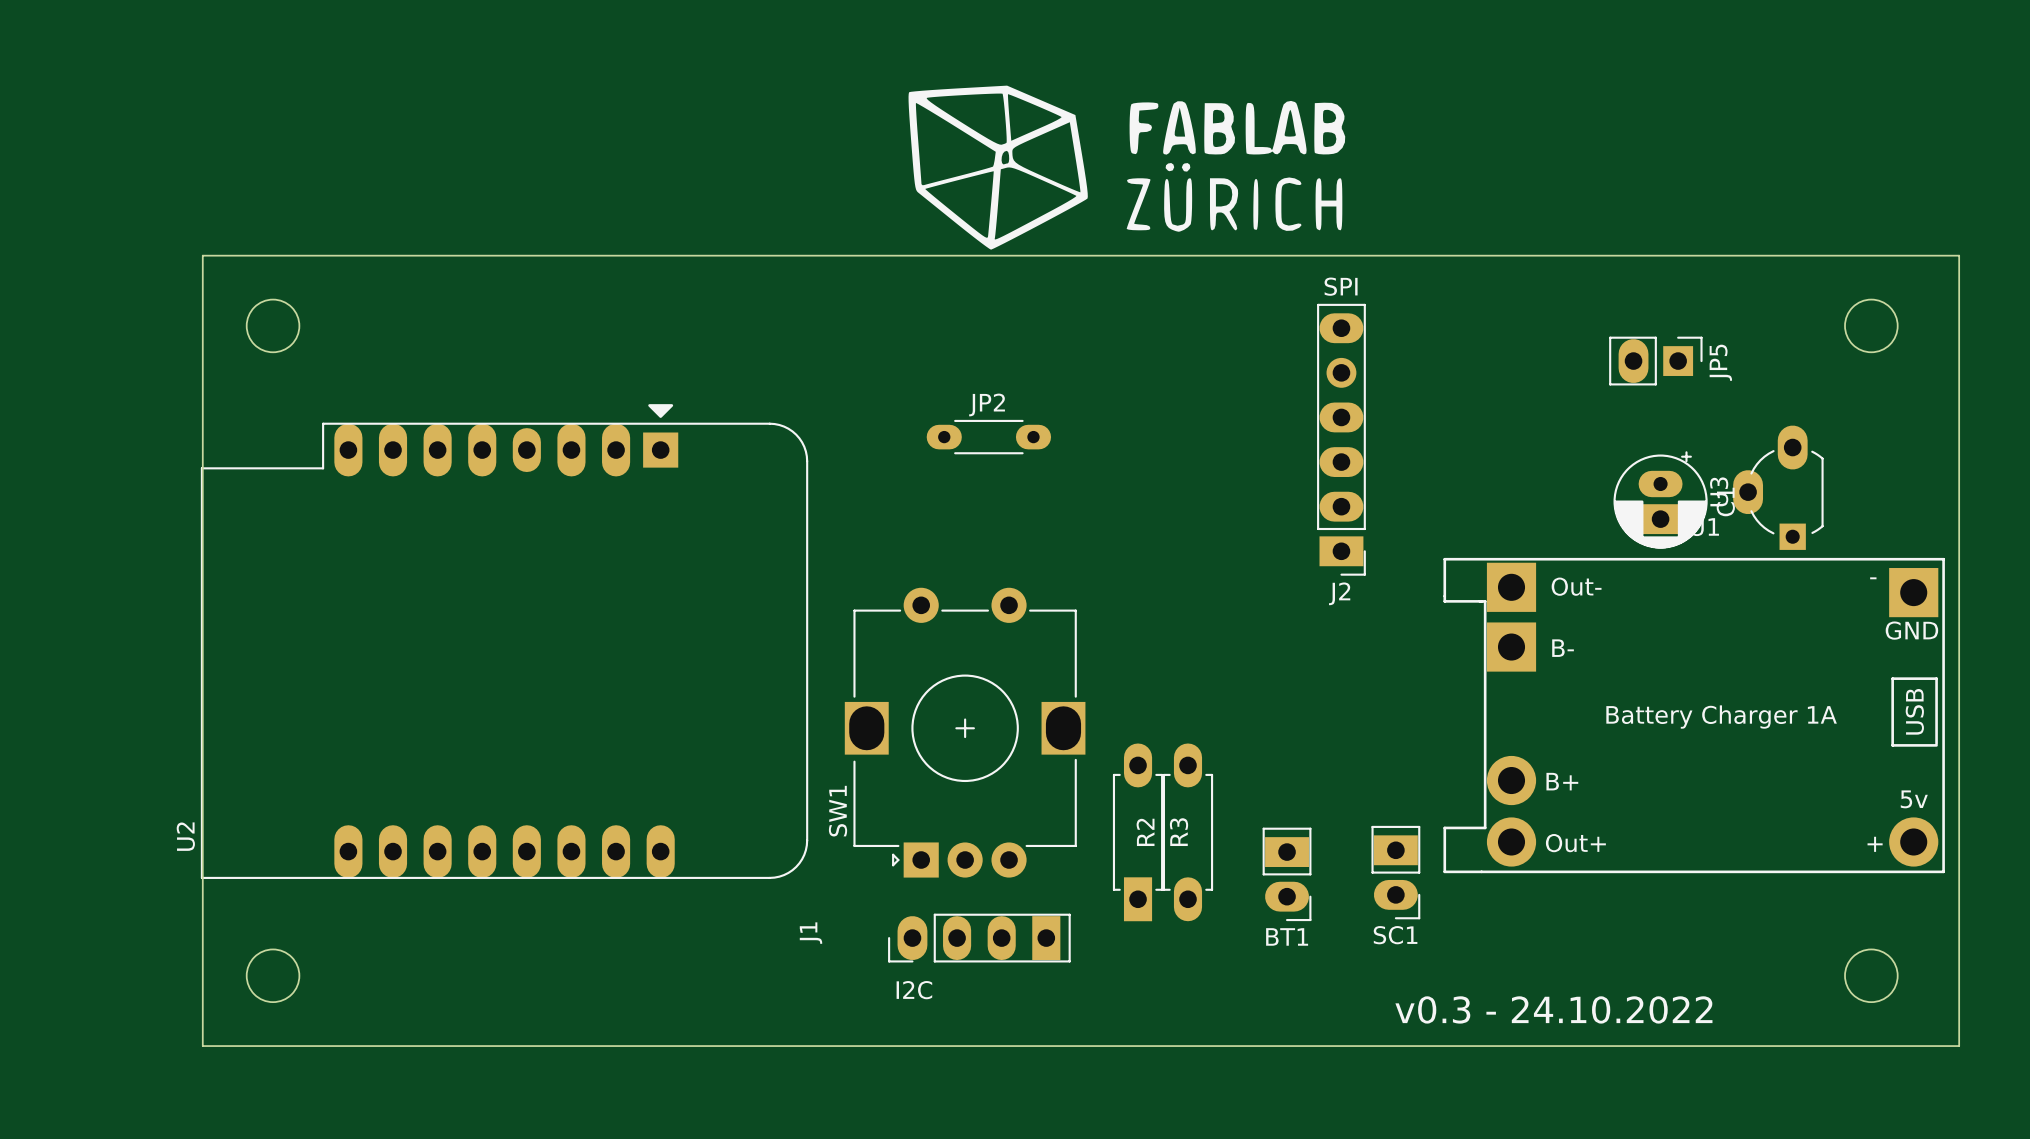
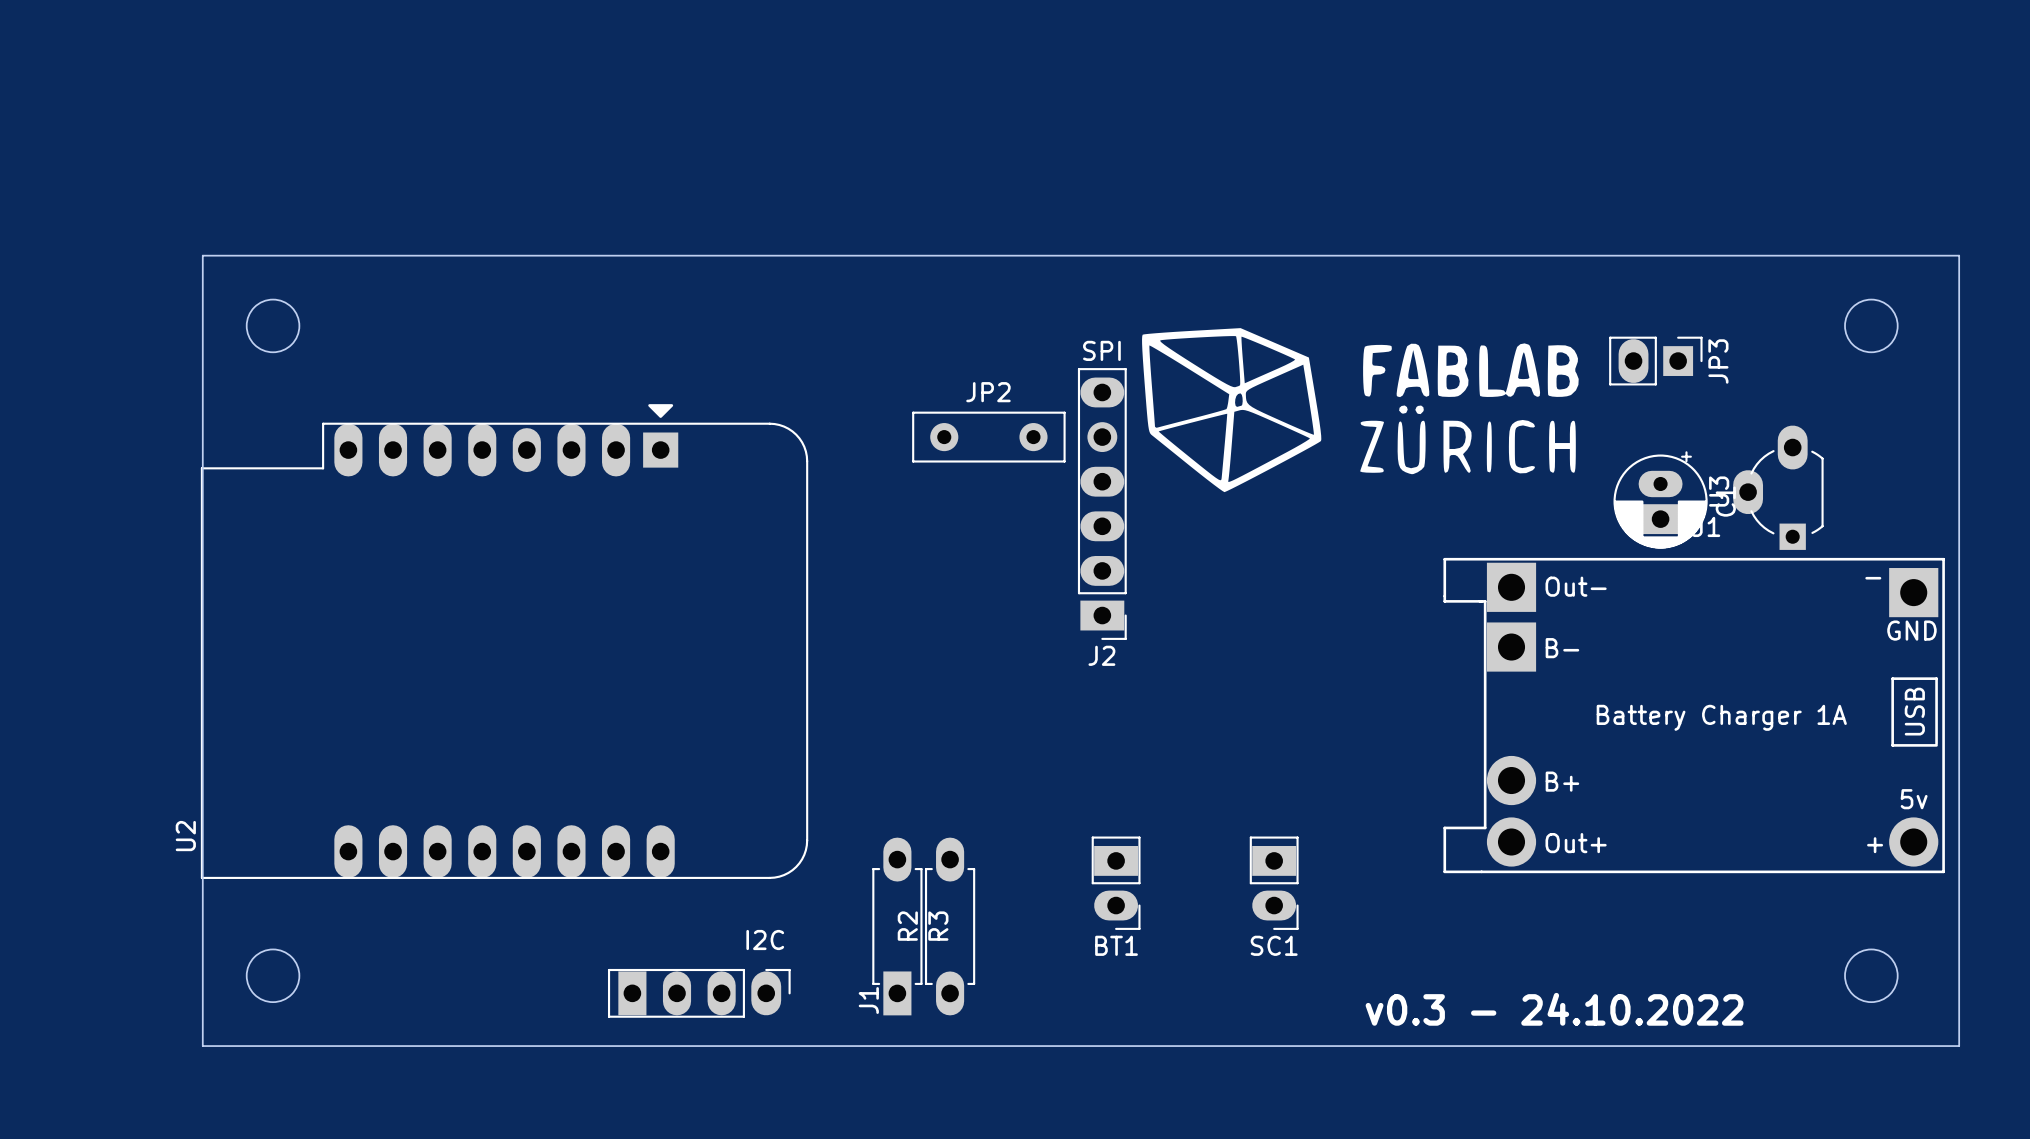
drawing position: (1126, 167) -> (1360, 410)
JP5 name: JP5 (1720, 362) -> JP3 (1718, 361)
JP2 footprint: [926, 419, 1052, 455] -> [912, 411, 1066, 463]
J2 position: (1341, 439) -> (1102, 504)
SW1: (965, 732) -> none
R3 position: (1138, 832) -> (897, 926)
R2 position: (1187, 832) -> (950, 926)
SC1 position: (1395, 872) -> (1274, 883)
BT1 position: (1287, 874) -> (1116, 883)
J1 rotation: 0° (979, 938) -> 180° (699, 993)
J1 position: (979, 938) -> (699, 993)

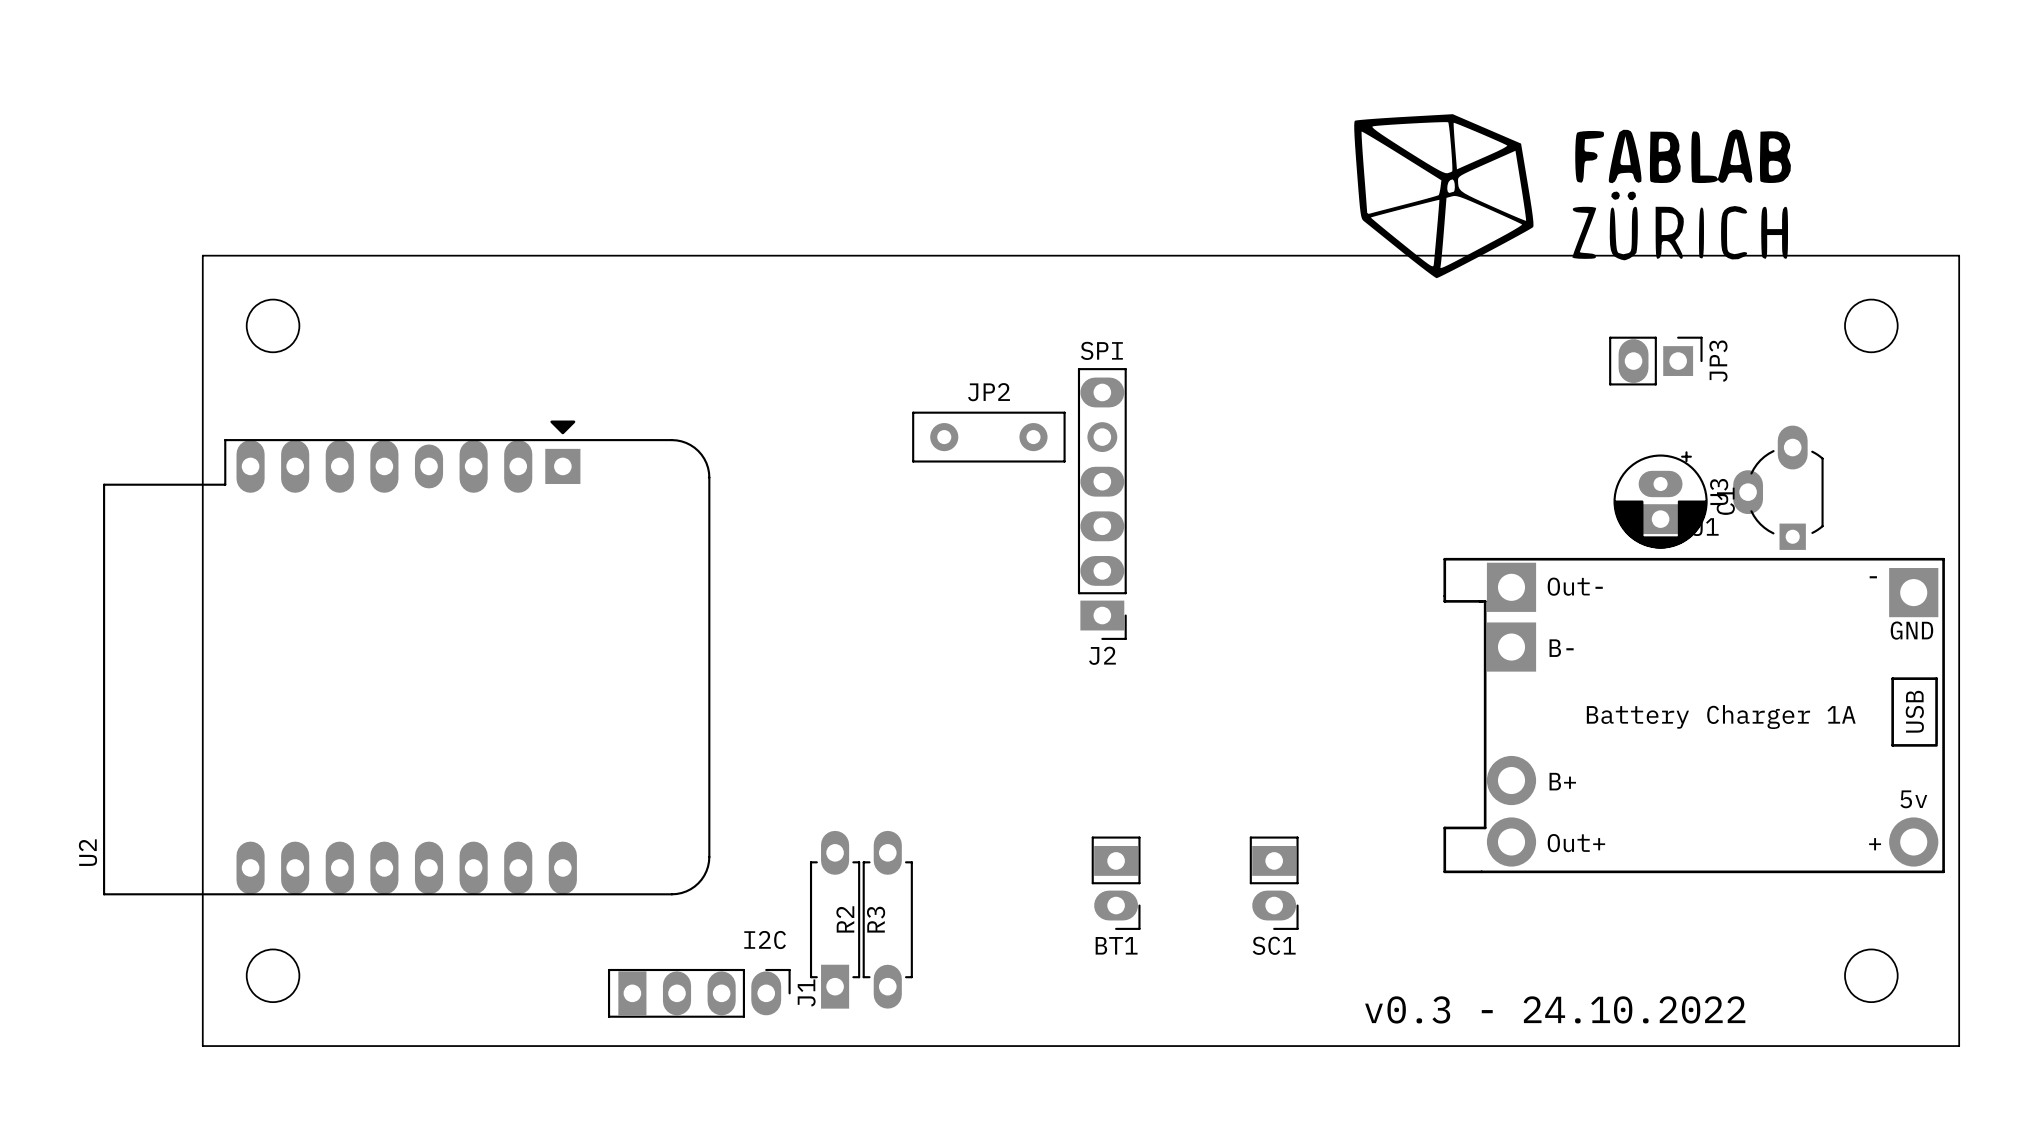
drawing position: (1360, 410) -> (1572, 196)
U2 position: (504, 641) -> (406, 657)
R3 position: (897, 926) -> (835, 919)
R2 position: (950, 926) -> (887, 919)
J1 name position: J1 (868, 1000) -> J1 (806, 993)

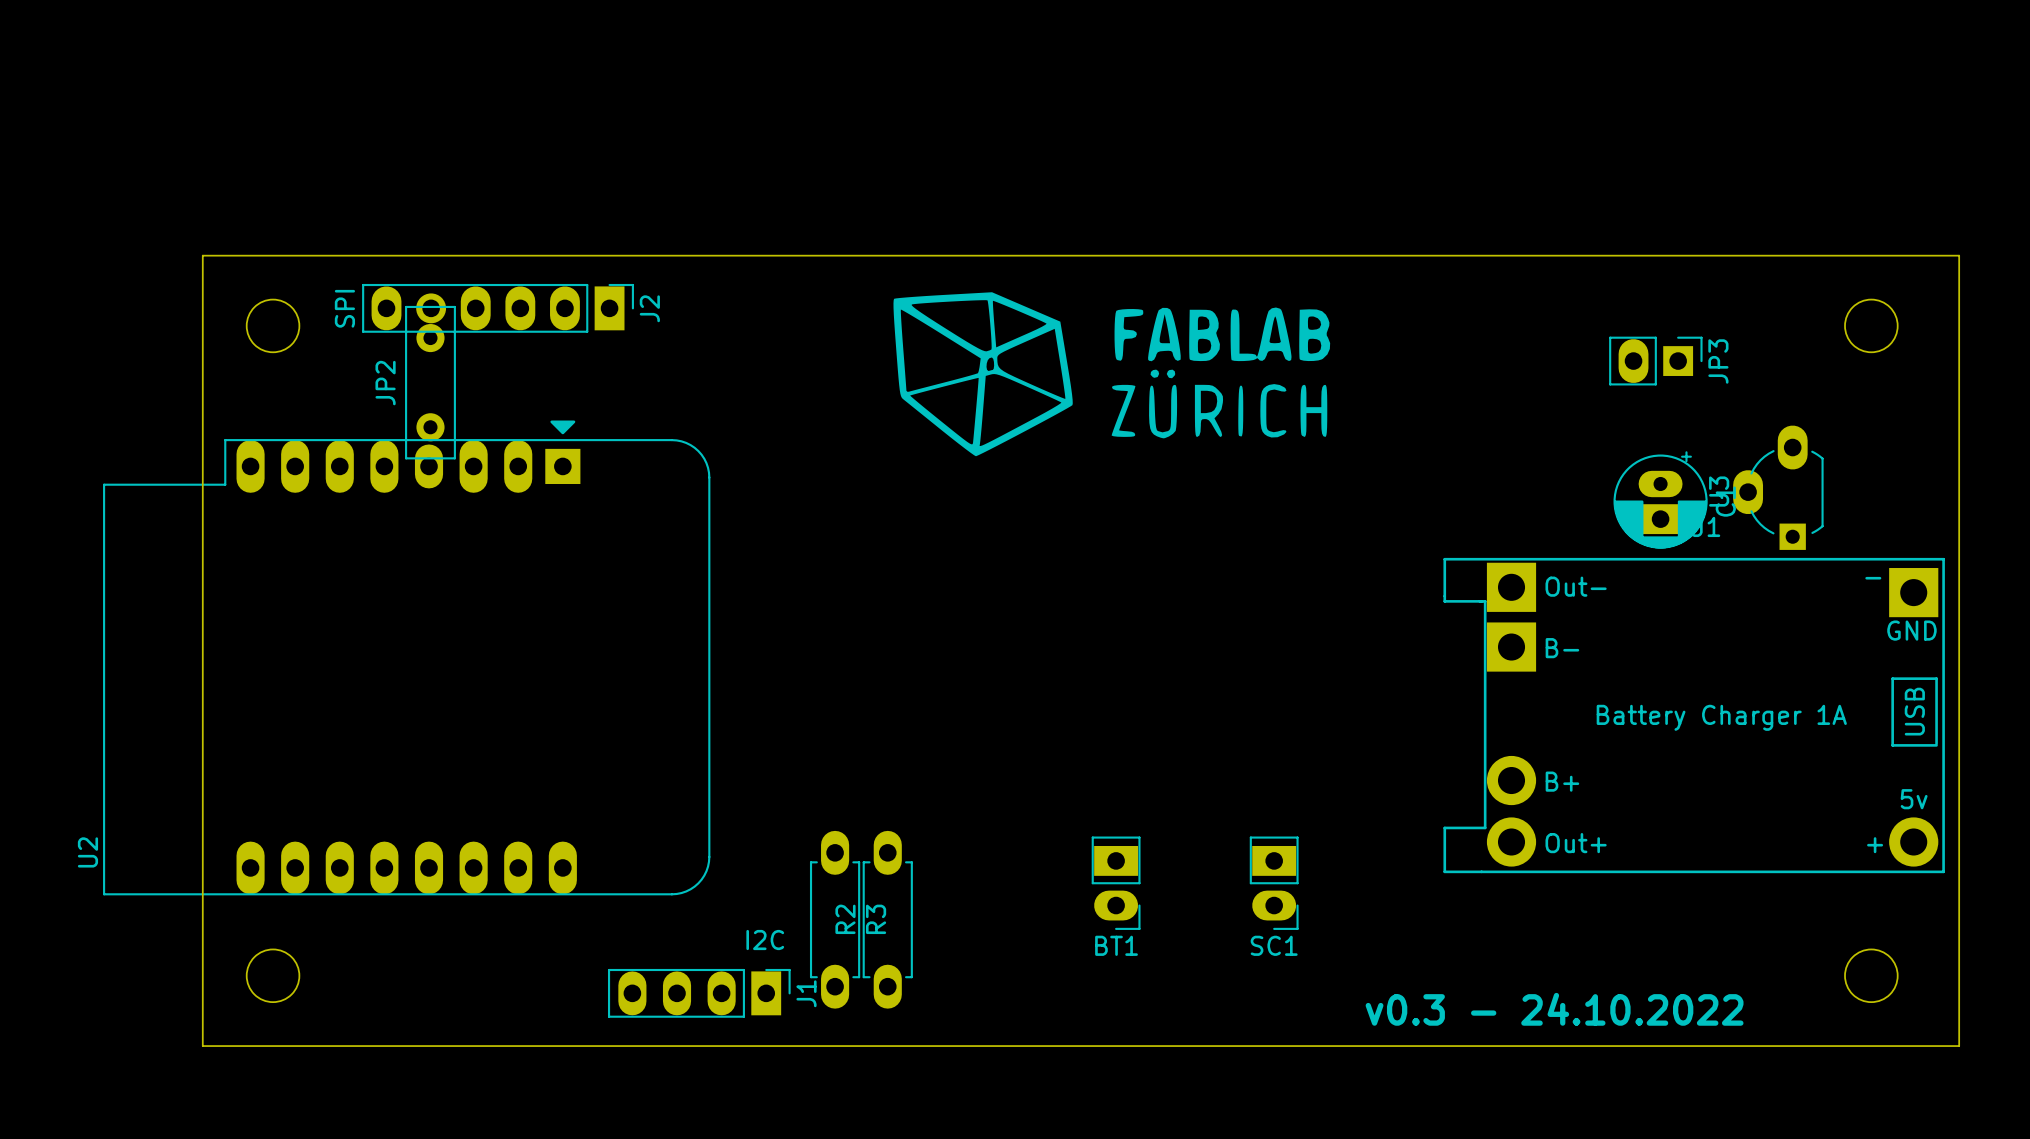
drawing: [1354, 114, 1791, 279] -> none
drawing: none -> [893, 292, 1331, 457]
JP2 name position: JP2 (989, 392) -> JP2 (385, 383)
JP2 rotation: 0° (988, 437) -> 90° clockwise (430, 382)
JP2 position: (988, 437) -> (430, 382)
J2 rotation: 0° (1102, 504) -> 90° counterclockwise (498, 308)
J2 position: (1102, 504) -> (498, 308)
R3 footprint: [809, 830, 861, 1009] -> [809, 830, 861, 1009]
J1 footprint: [607, 968, 791, 1018] -> [607, 968, 791, 1018]

